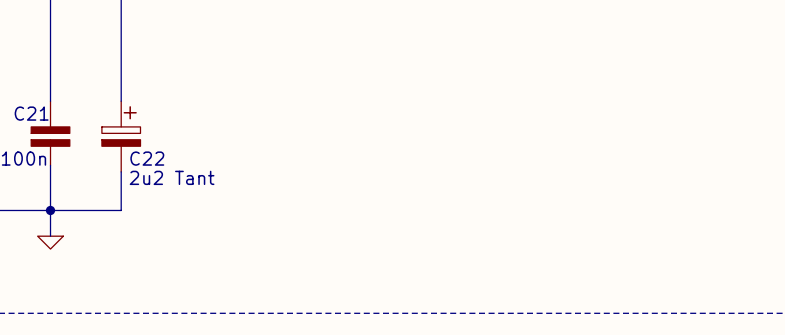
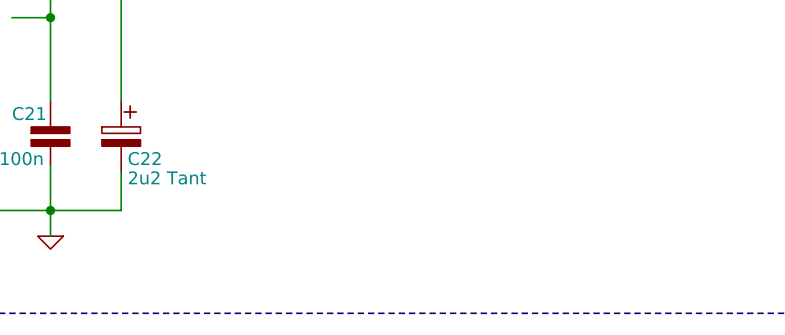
wire: none -> (11, 17) (50, 17)
junction: none -> (50, 17)

